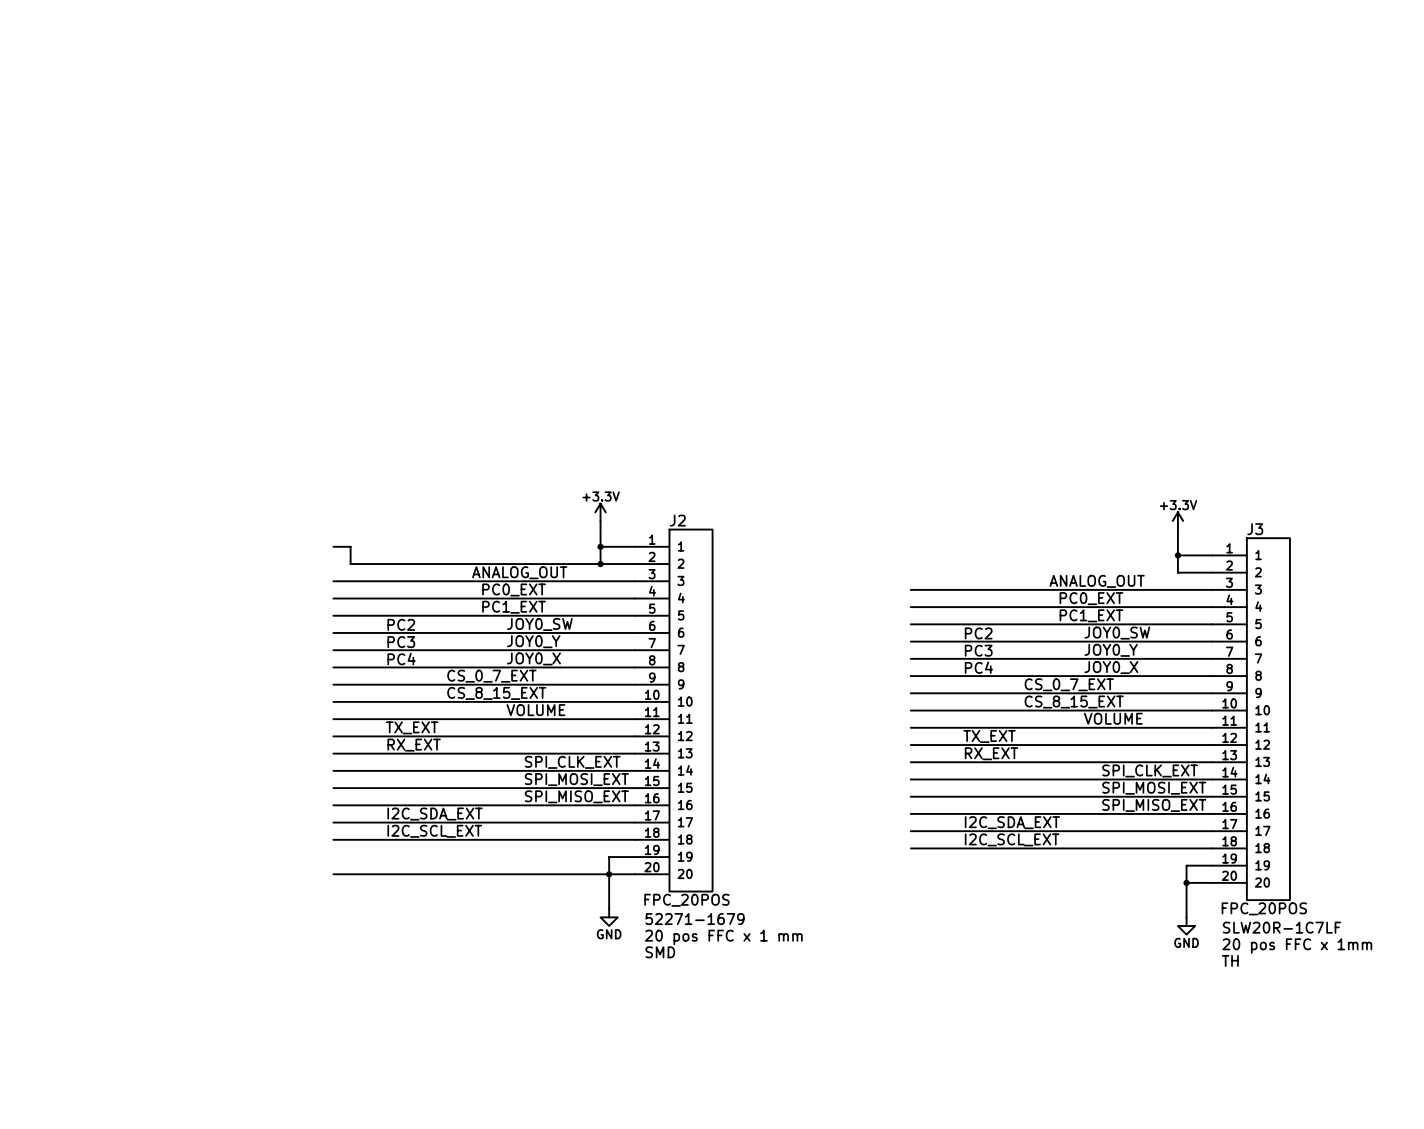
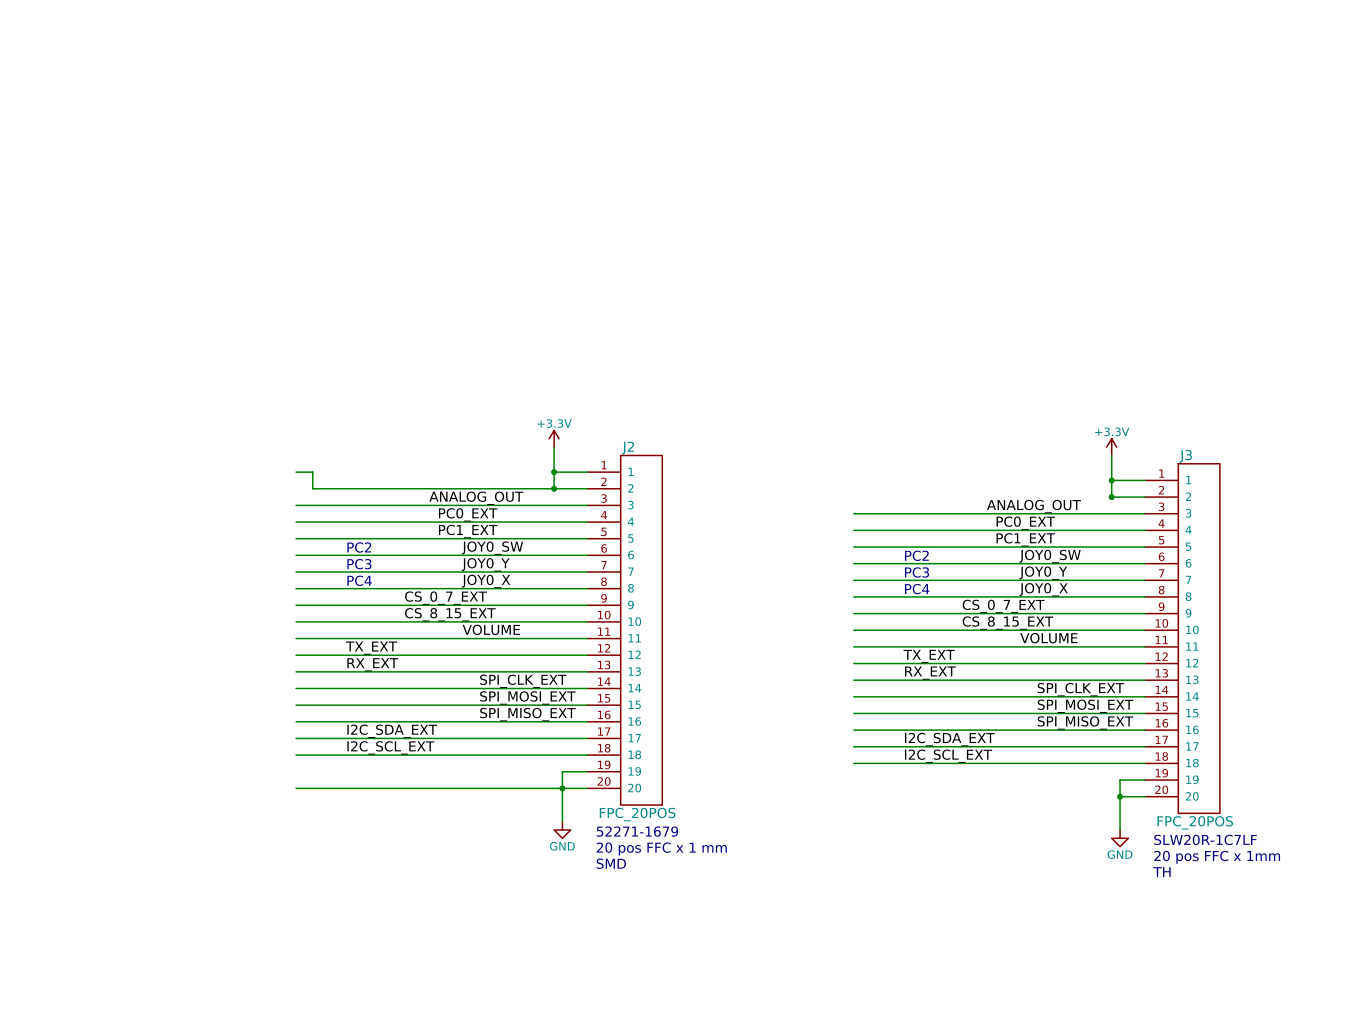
junction: none -> (1111, 497)

